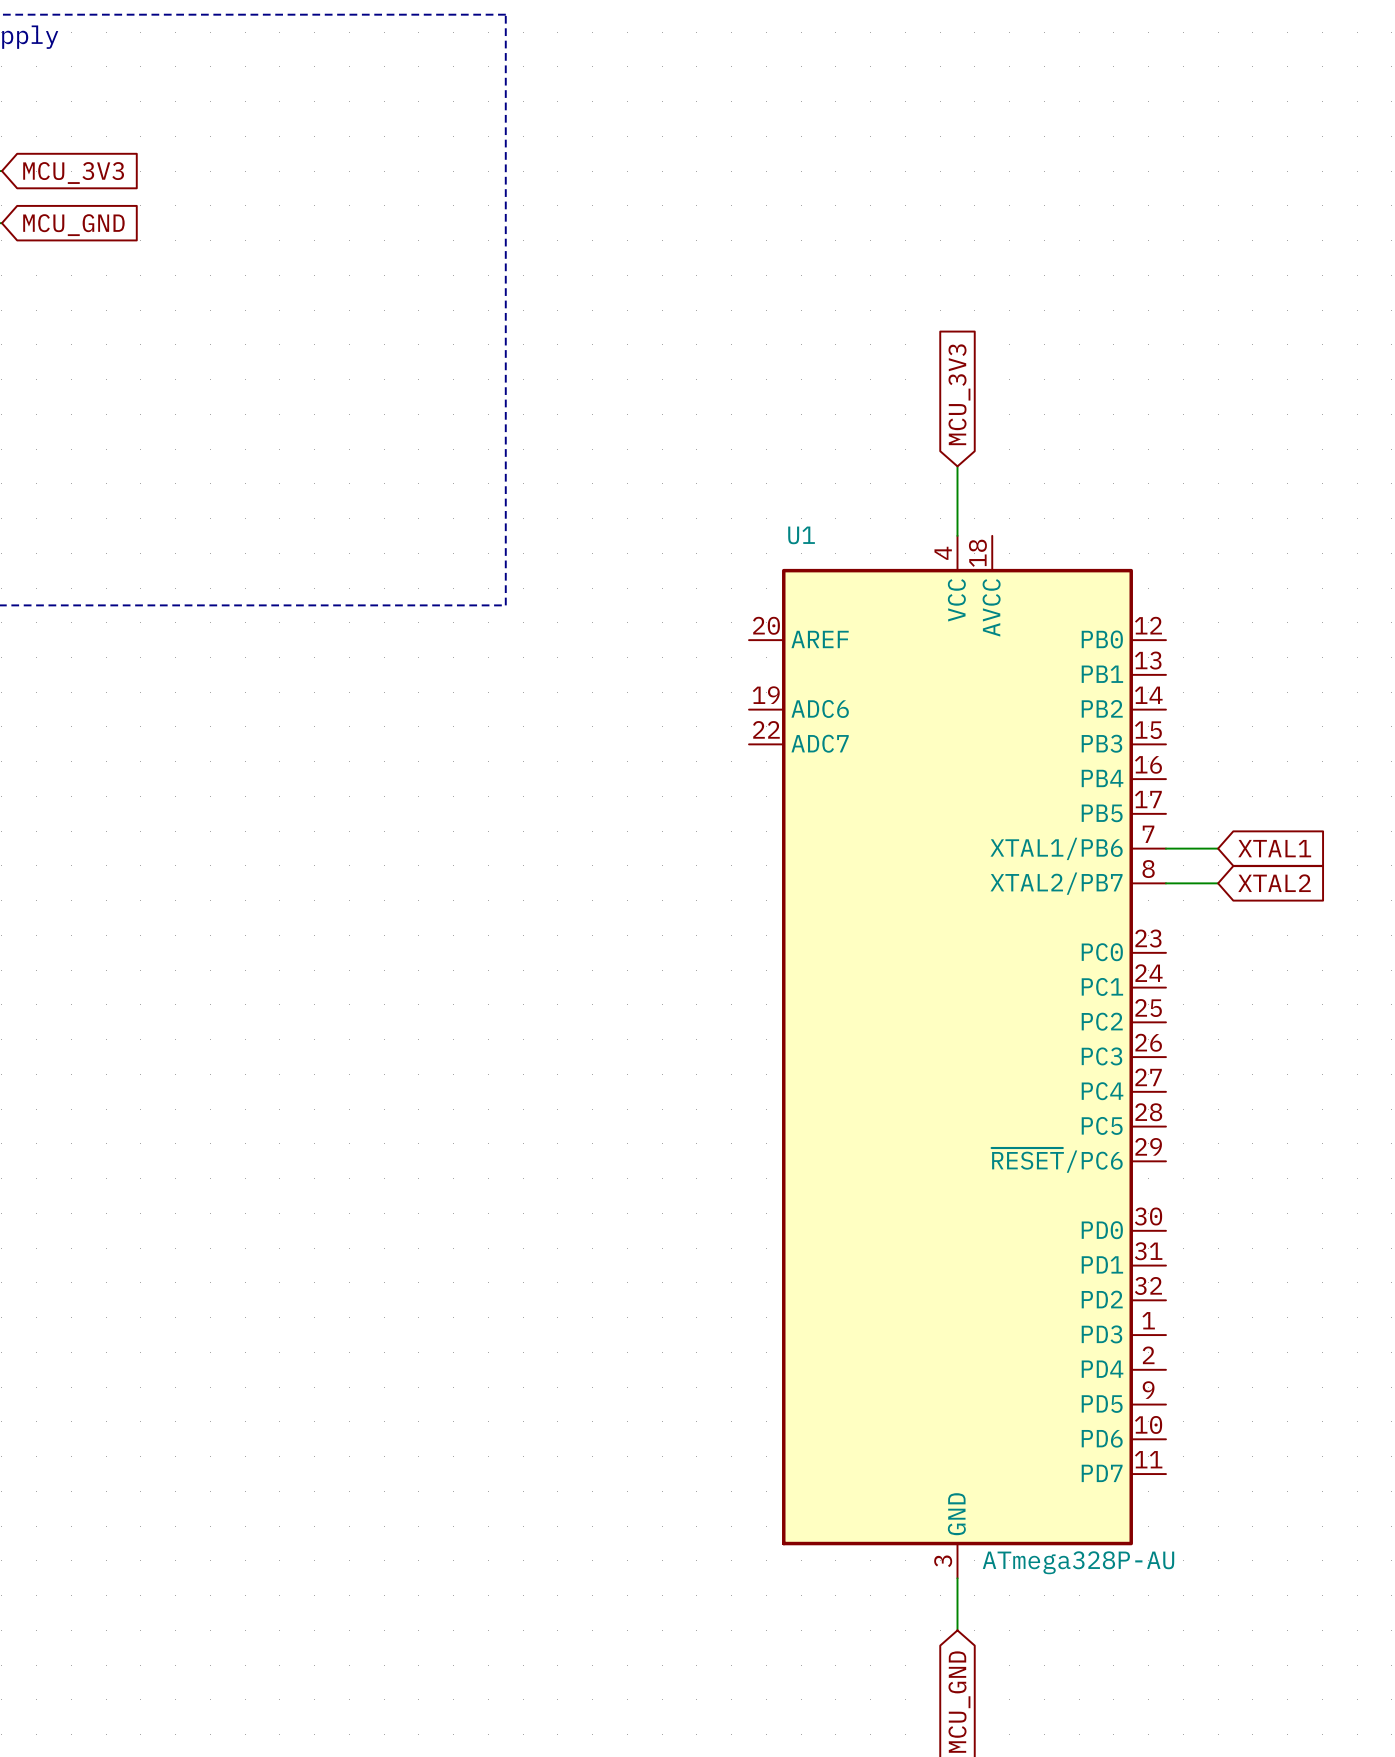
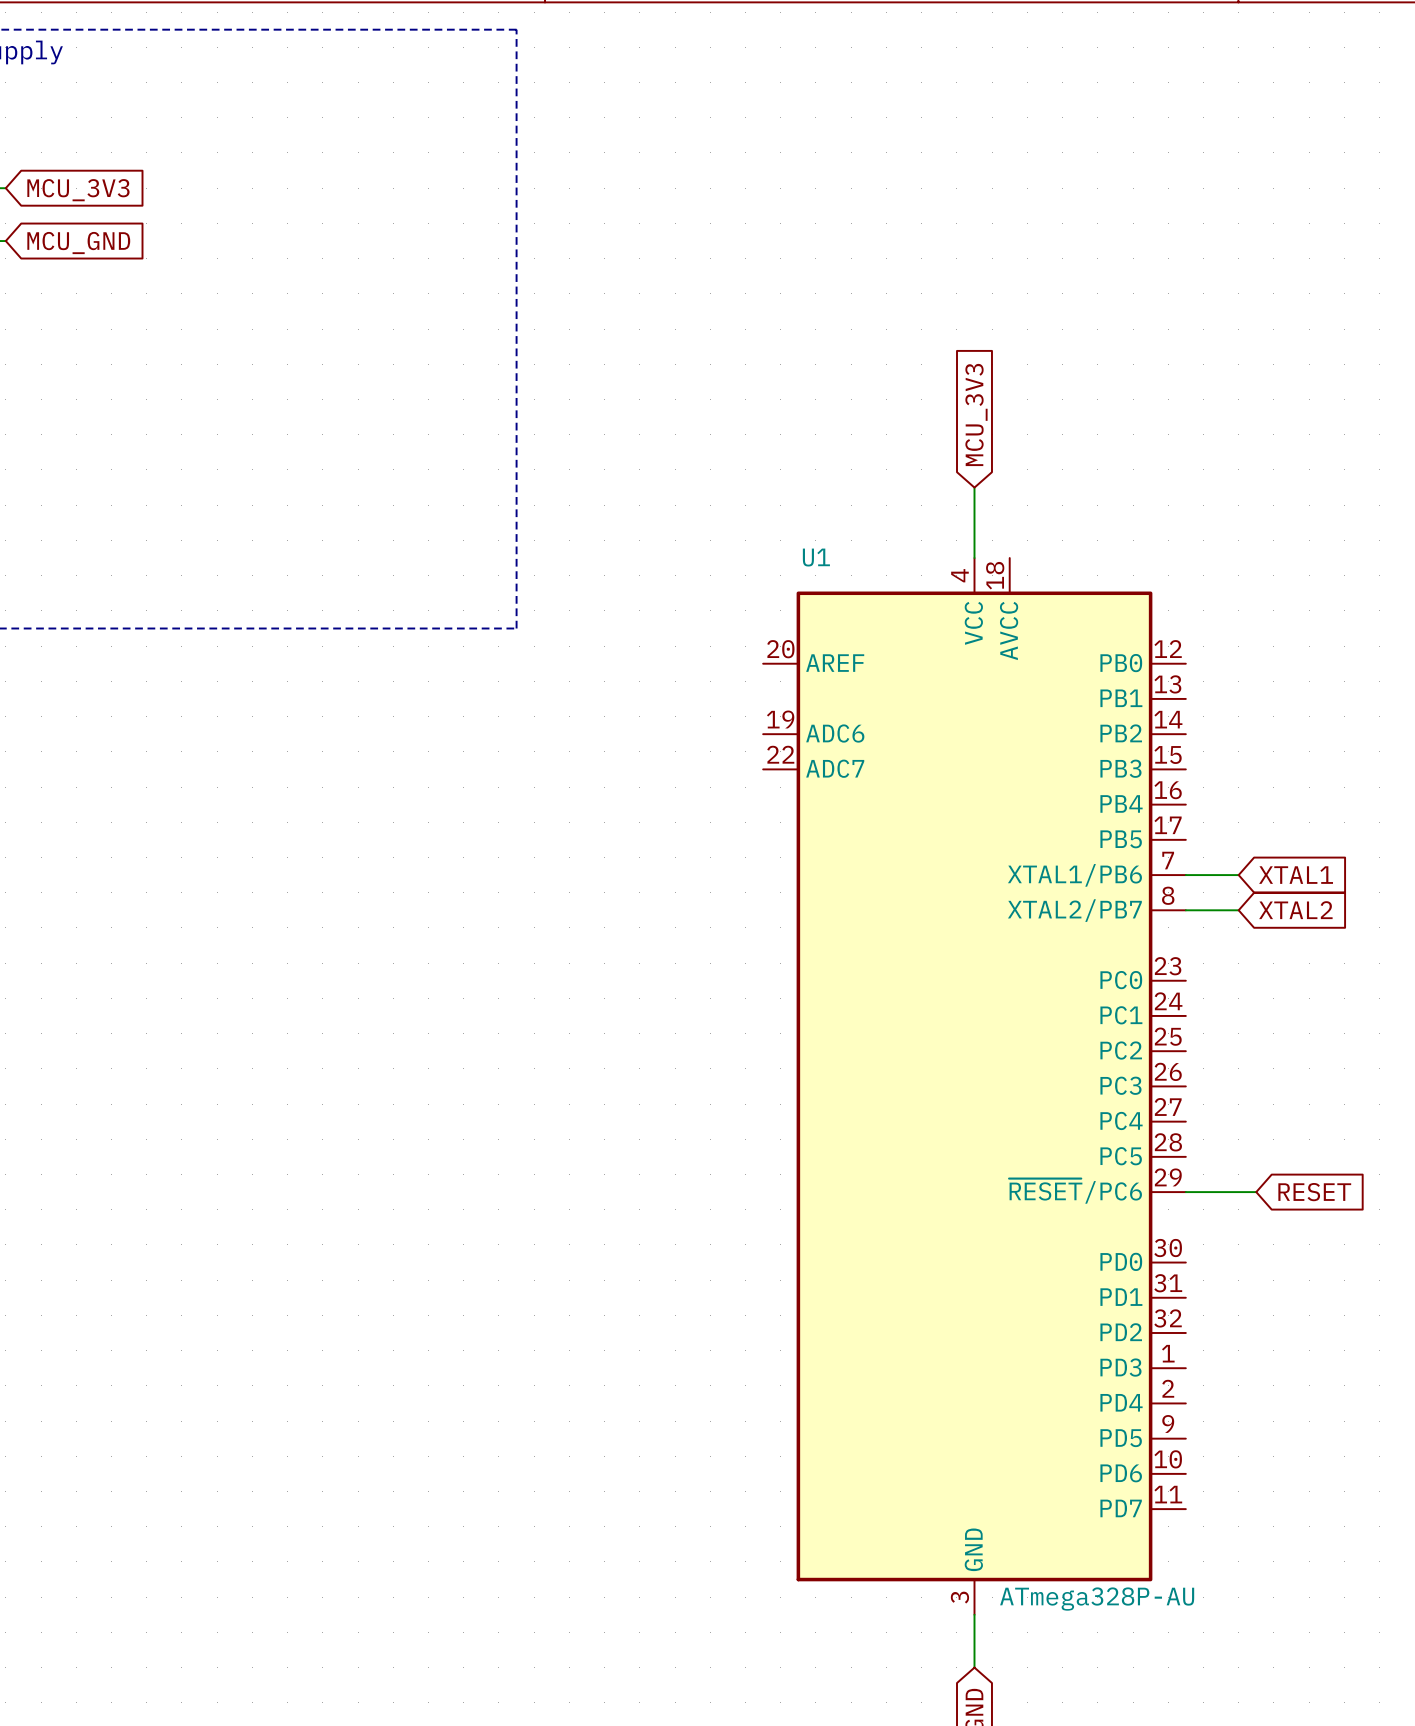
wire: none -> (1185, 1192) (1256, 1192)
global label: none -> RESET (1314, 1192)

